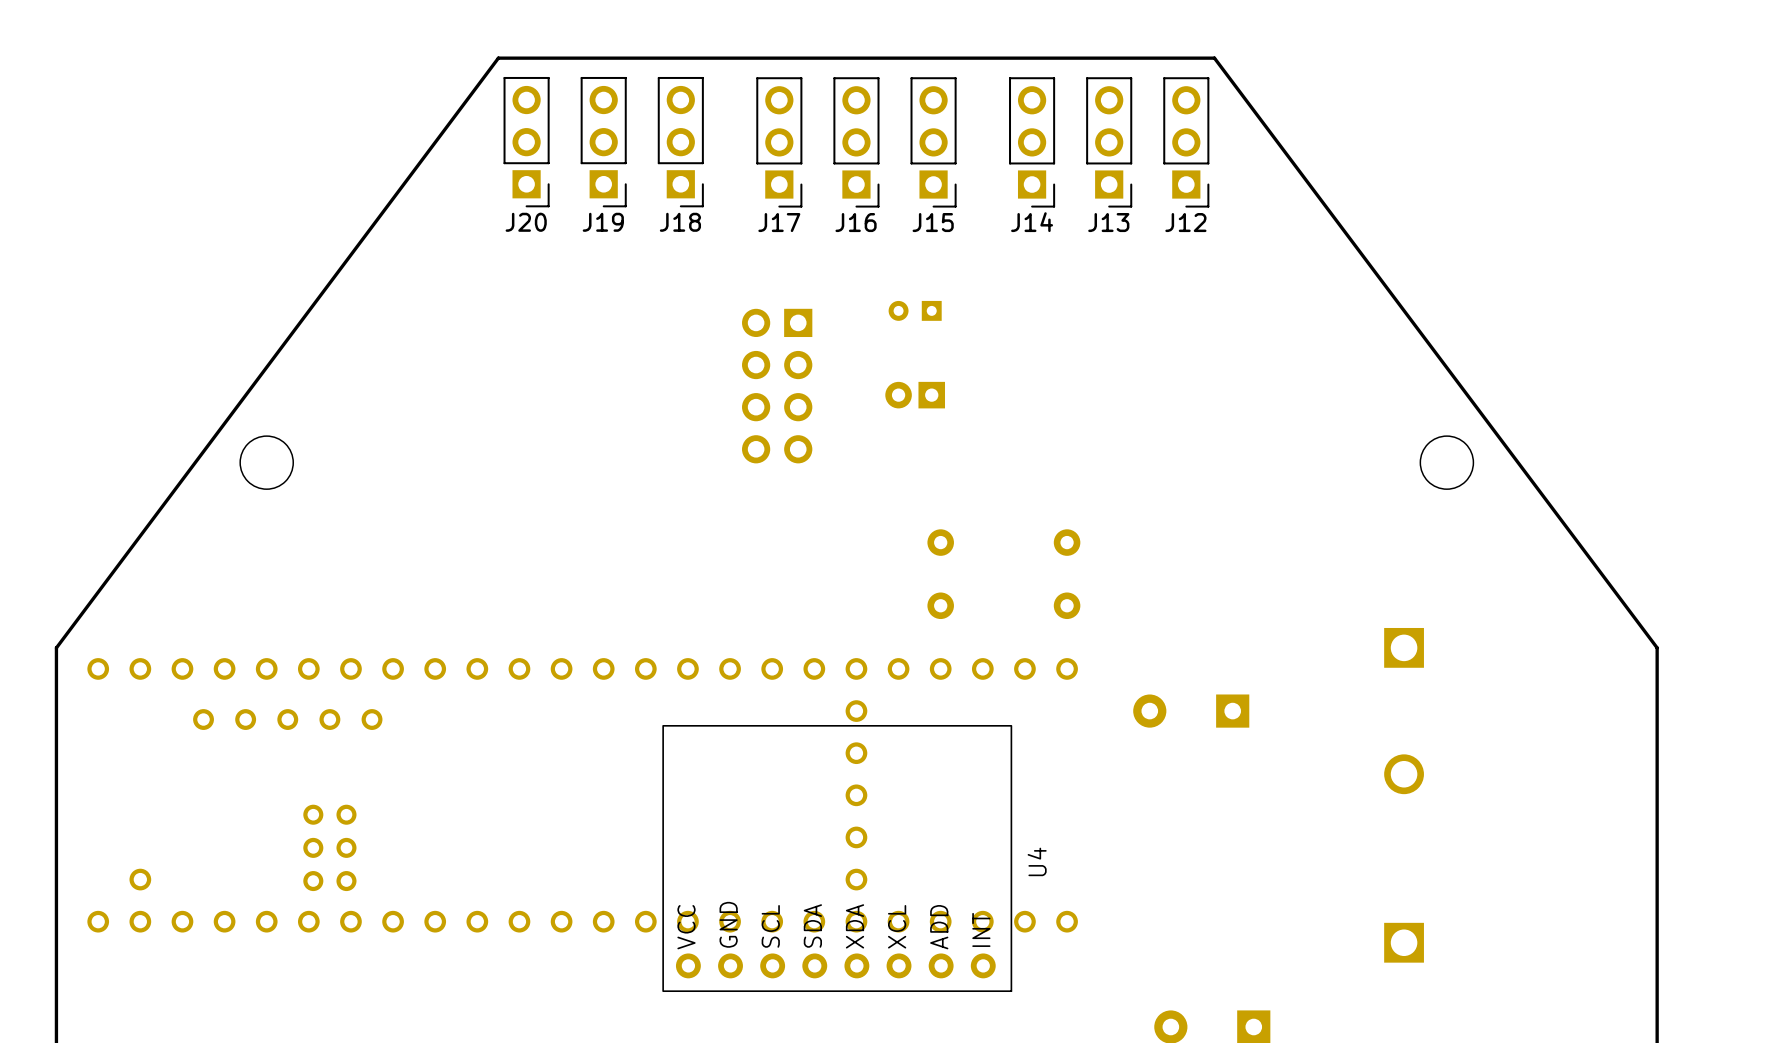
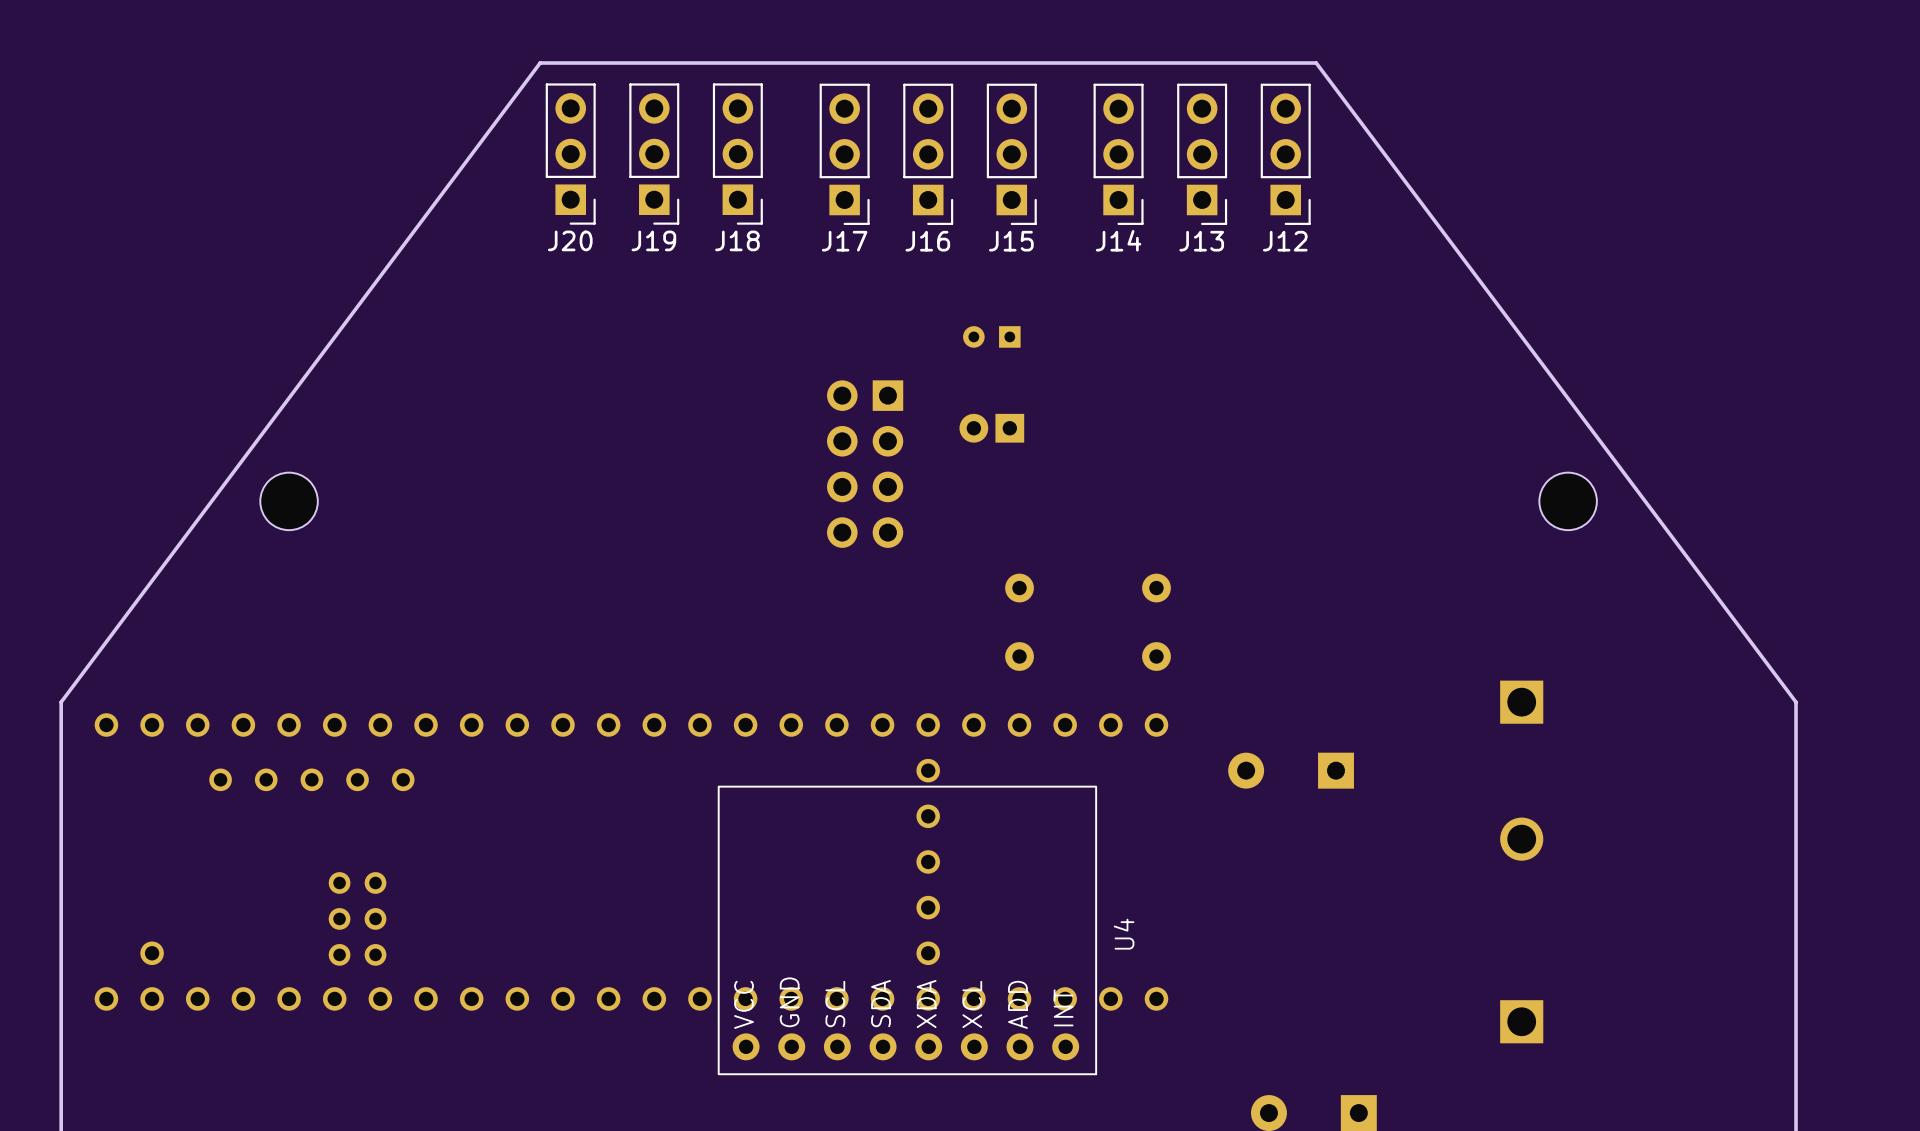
part position: (777, 386) -> (865, 464)

